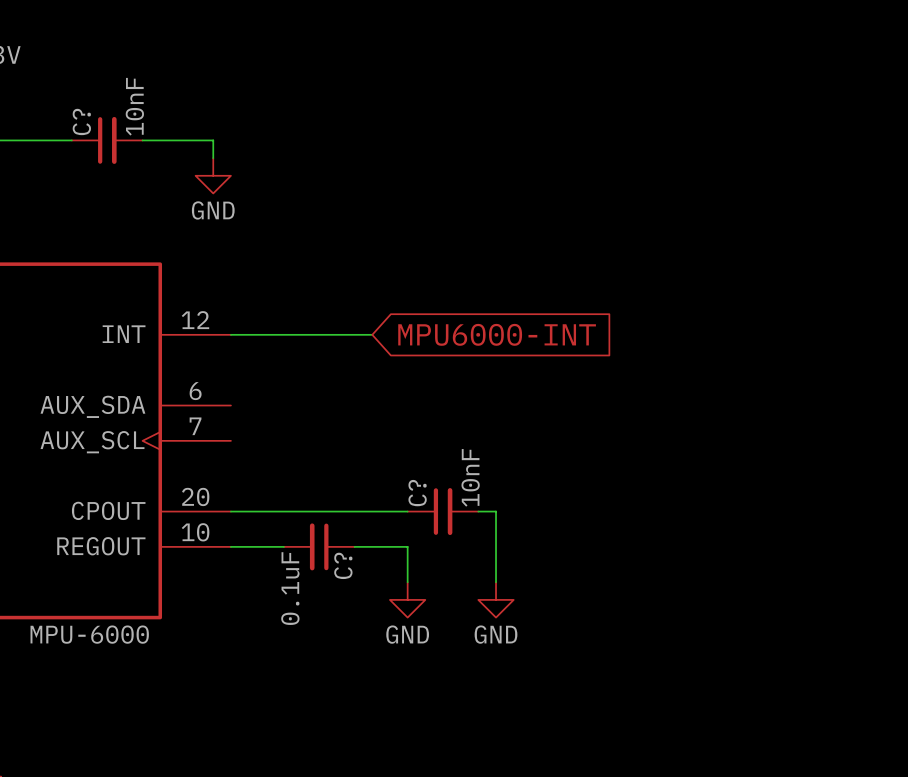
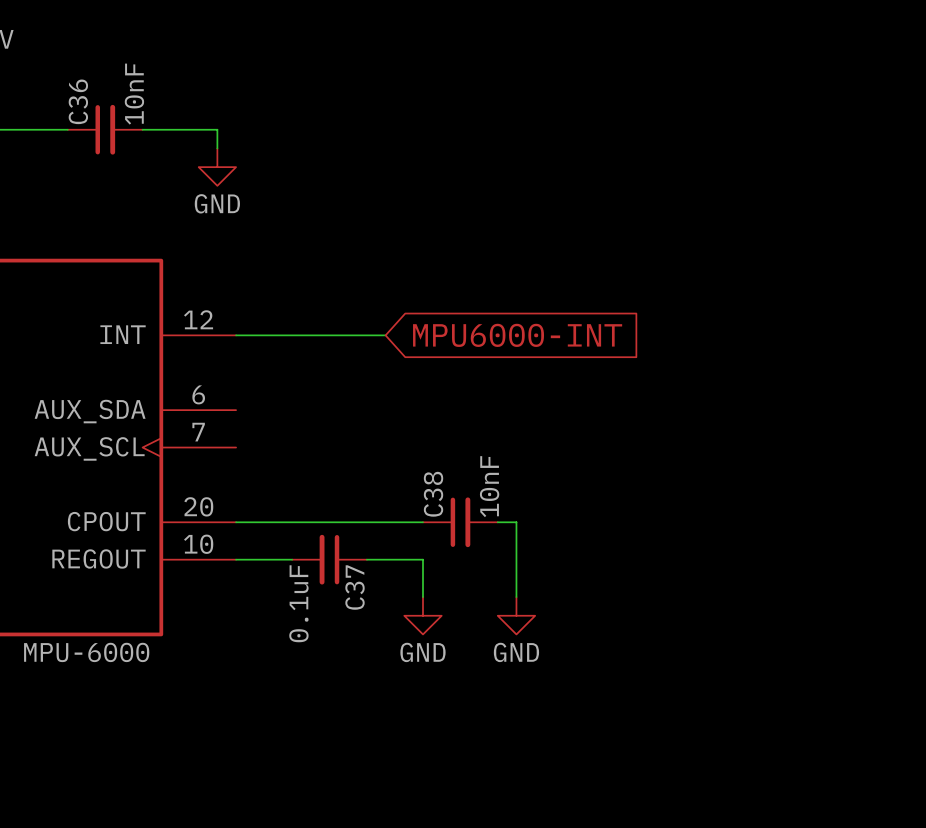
C? name: C? (81, 121) -> C36 (78, 101)
C? name: C? (417, 493) -> C38 (433, 494)
C? name: C? (343, 565) -> C37 (355, 587)

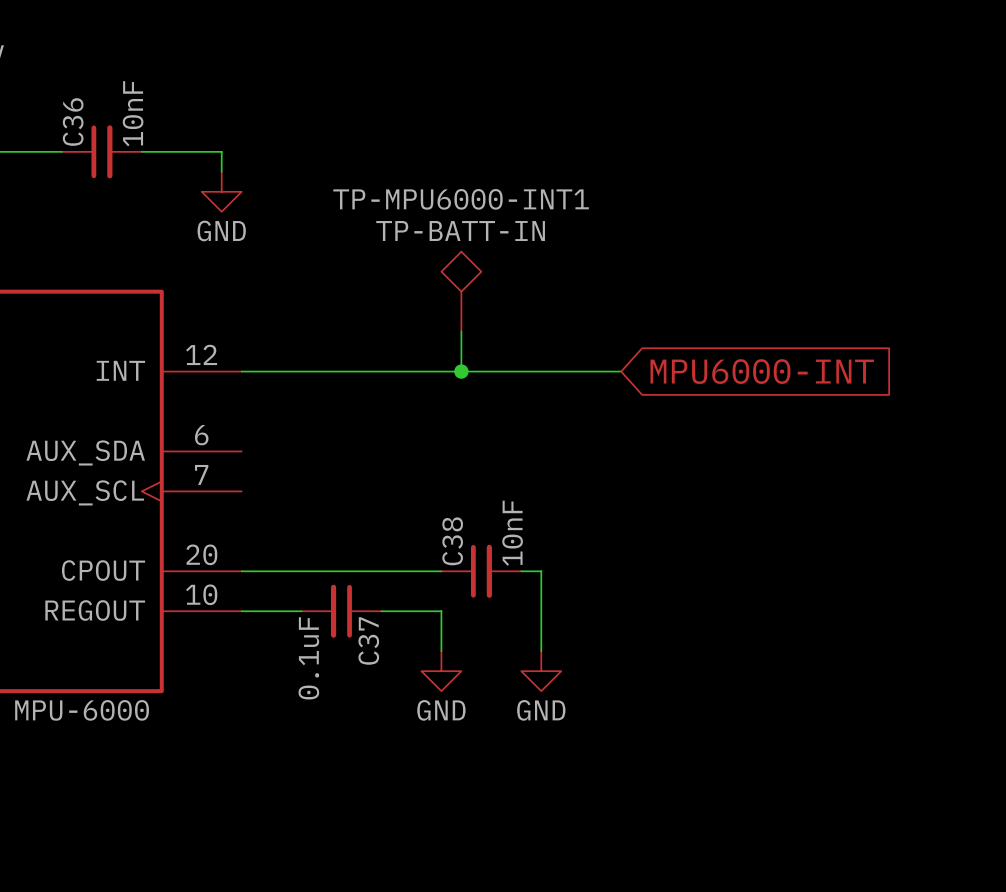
TP-MPU6000-INT1: none -> TP-BATT-IN (461, 291)
wire: none -> (461, 331) (461, 371)
wire: none -> (401, 371) (621, 371)
junction: none -> (461, 371)
global label position: MPU6000-INT (517, 335) -> MPU6000-INT (762, 371)

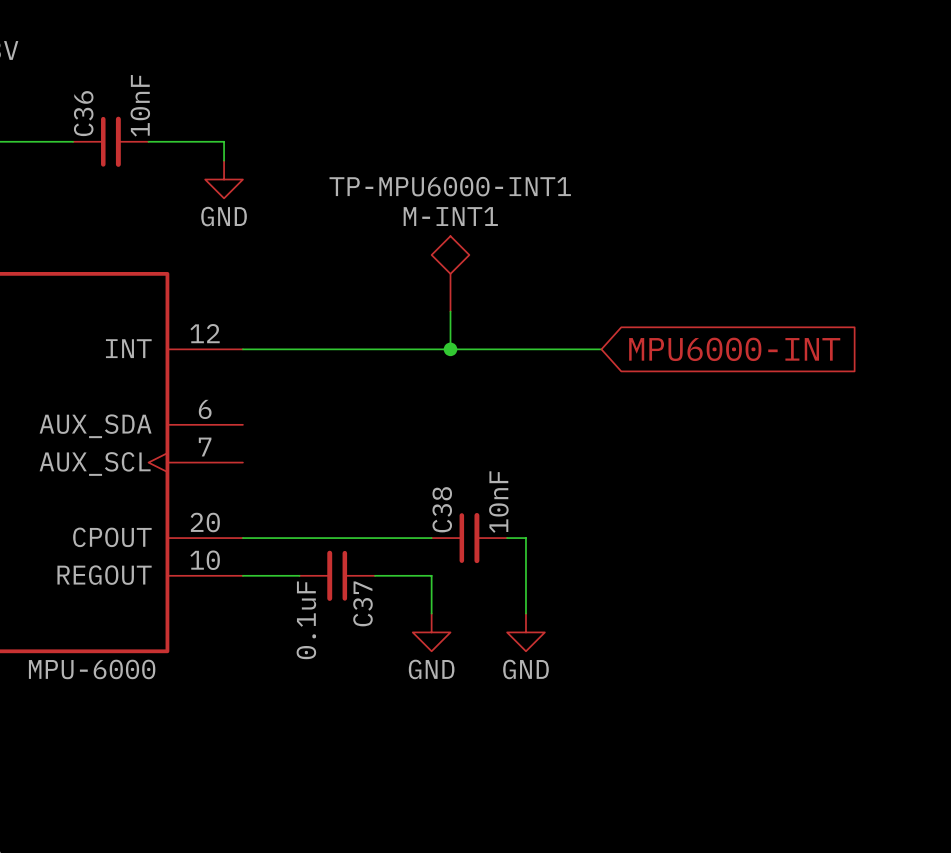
TP-MPU6000-INT1 value: TP-BATT-IN (460, 231) -> M-INT1 (450, 216)

